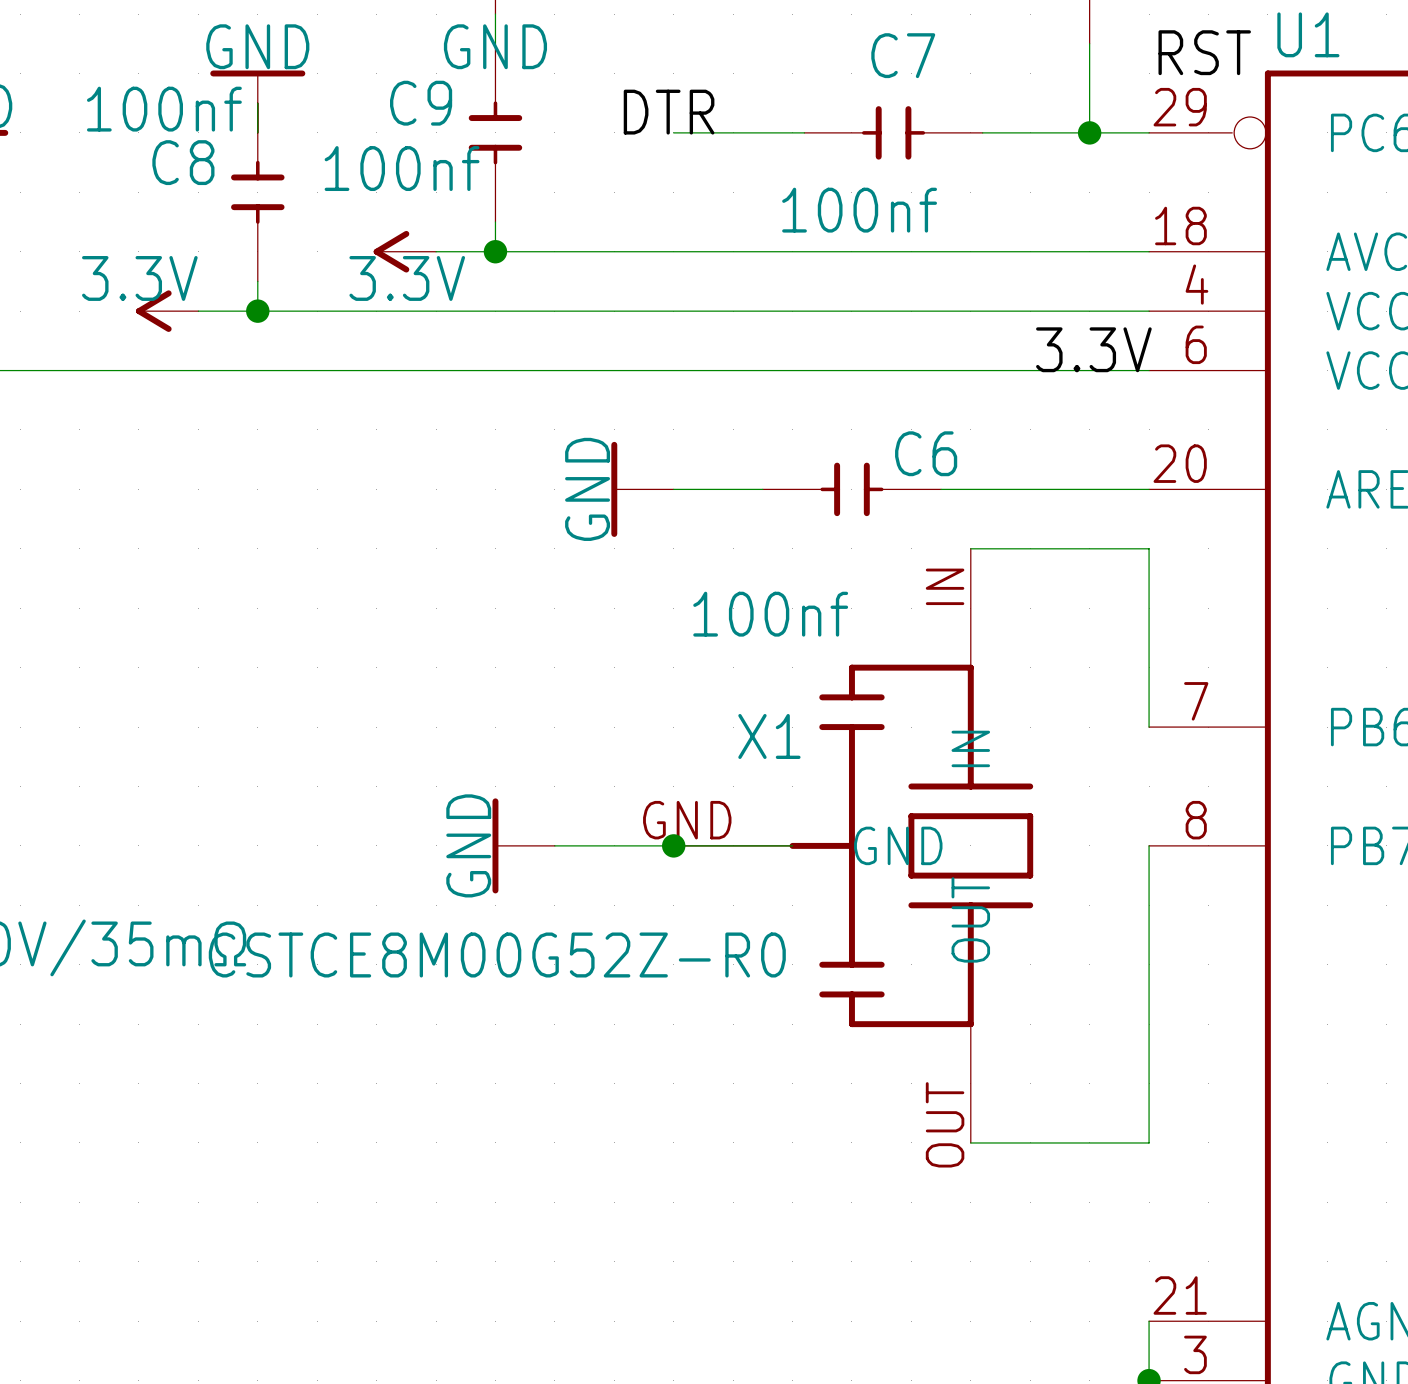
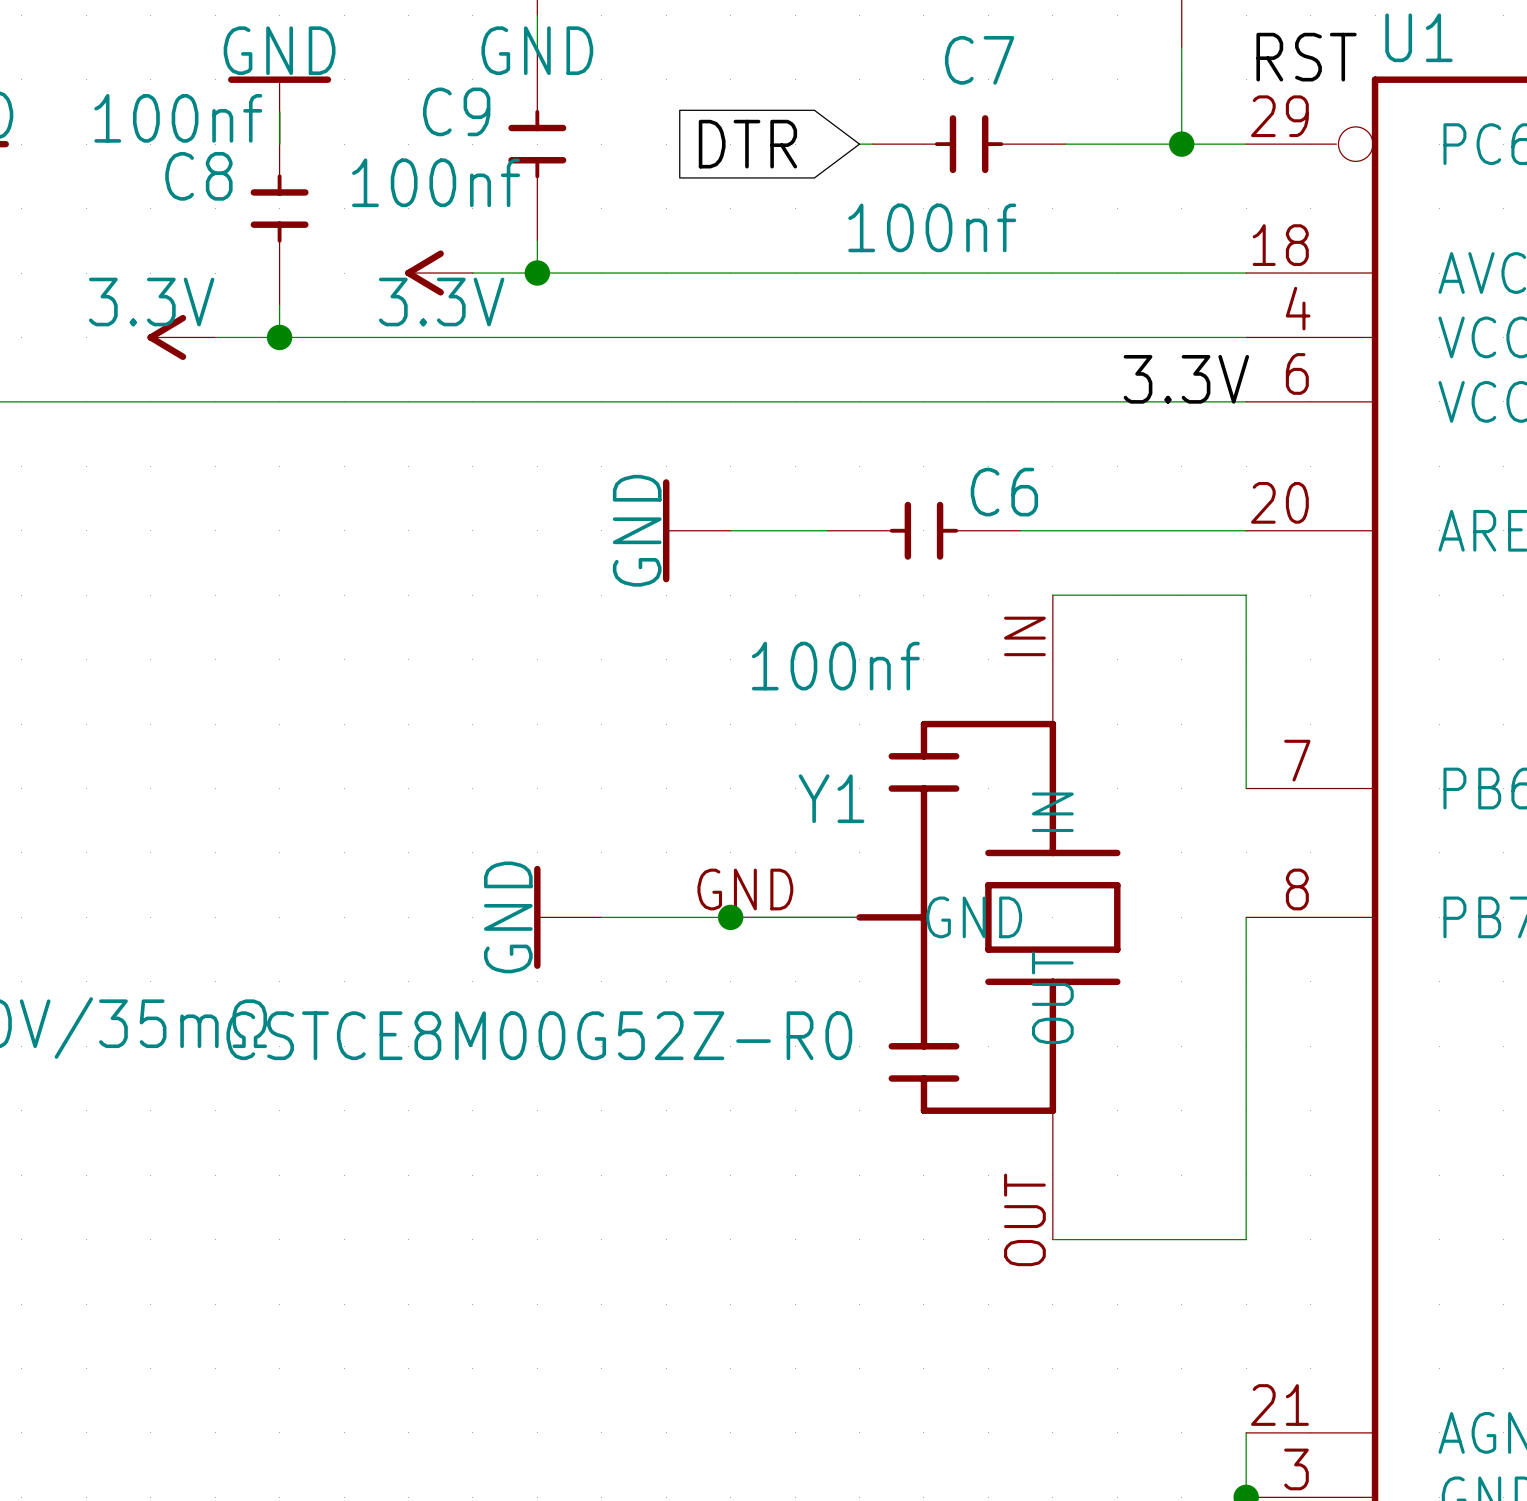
label: DTR (669, 112) -> none
wire: (673, 132) (792, 132) -> none
global label: none -> DTR (747, 144)
X1 name: X1 (769, 736) -> Y1 (831, 798)

